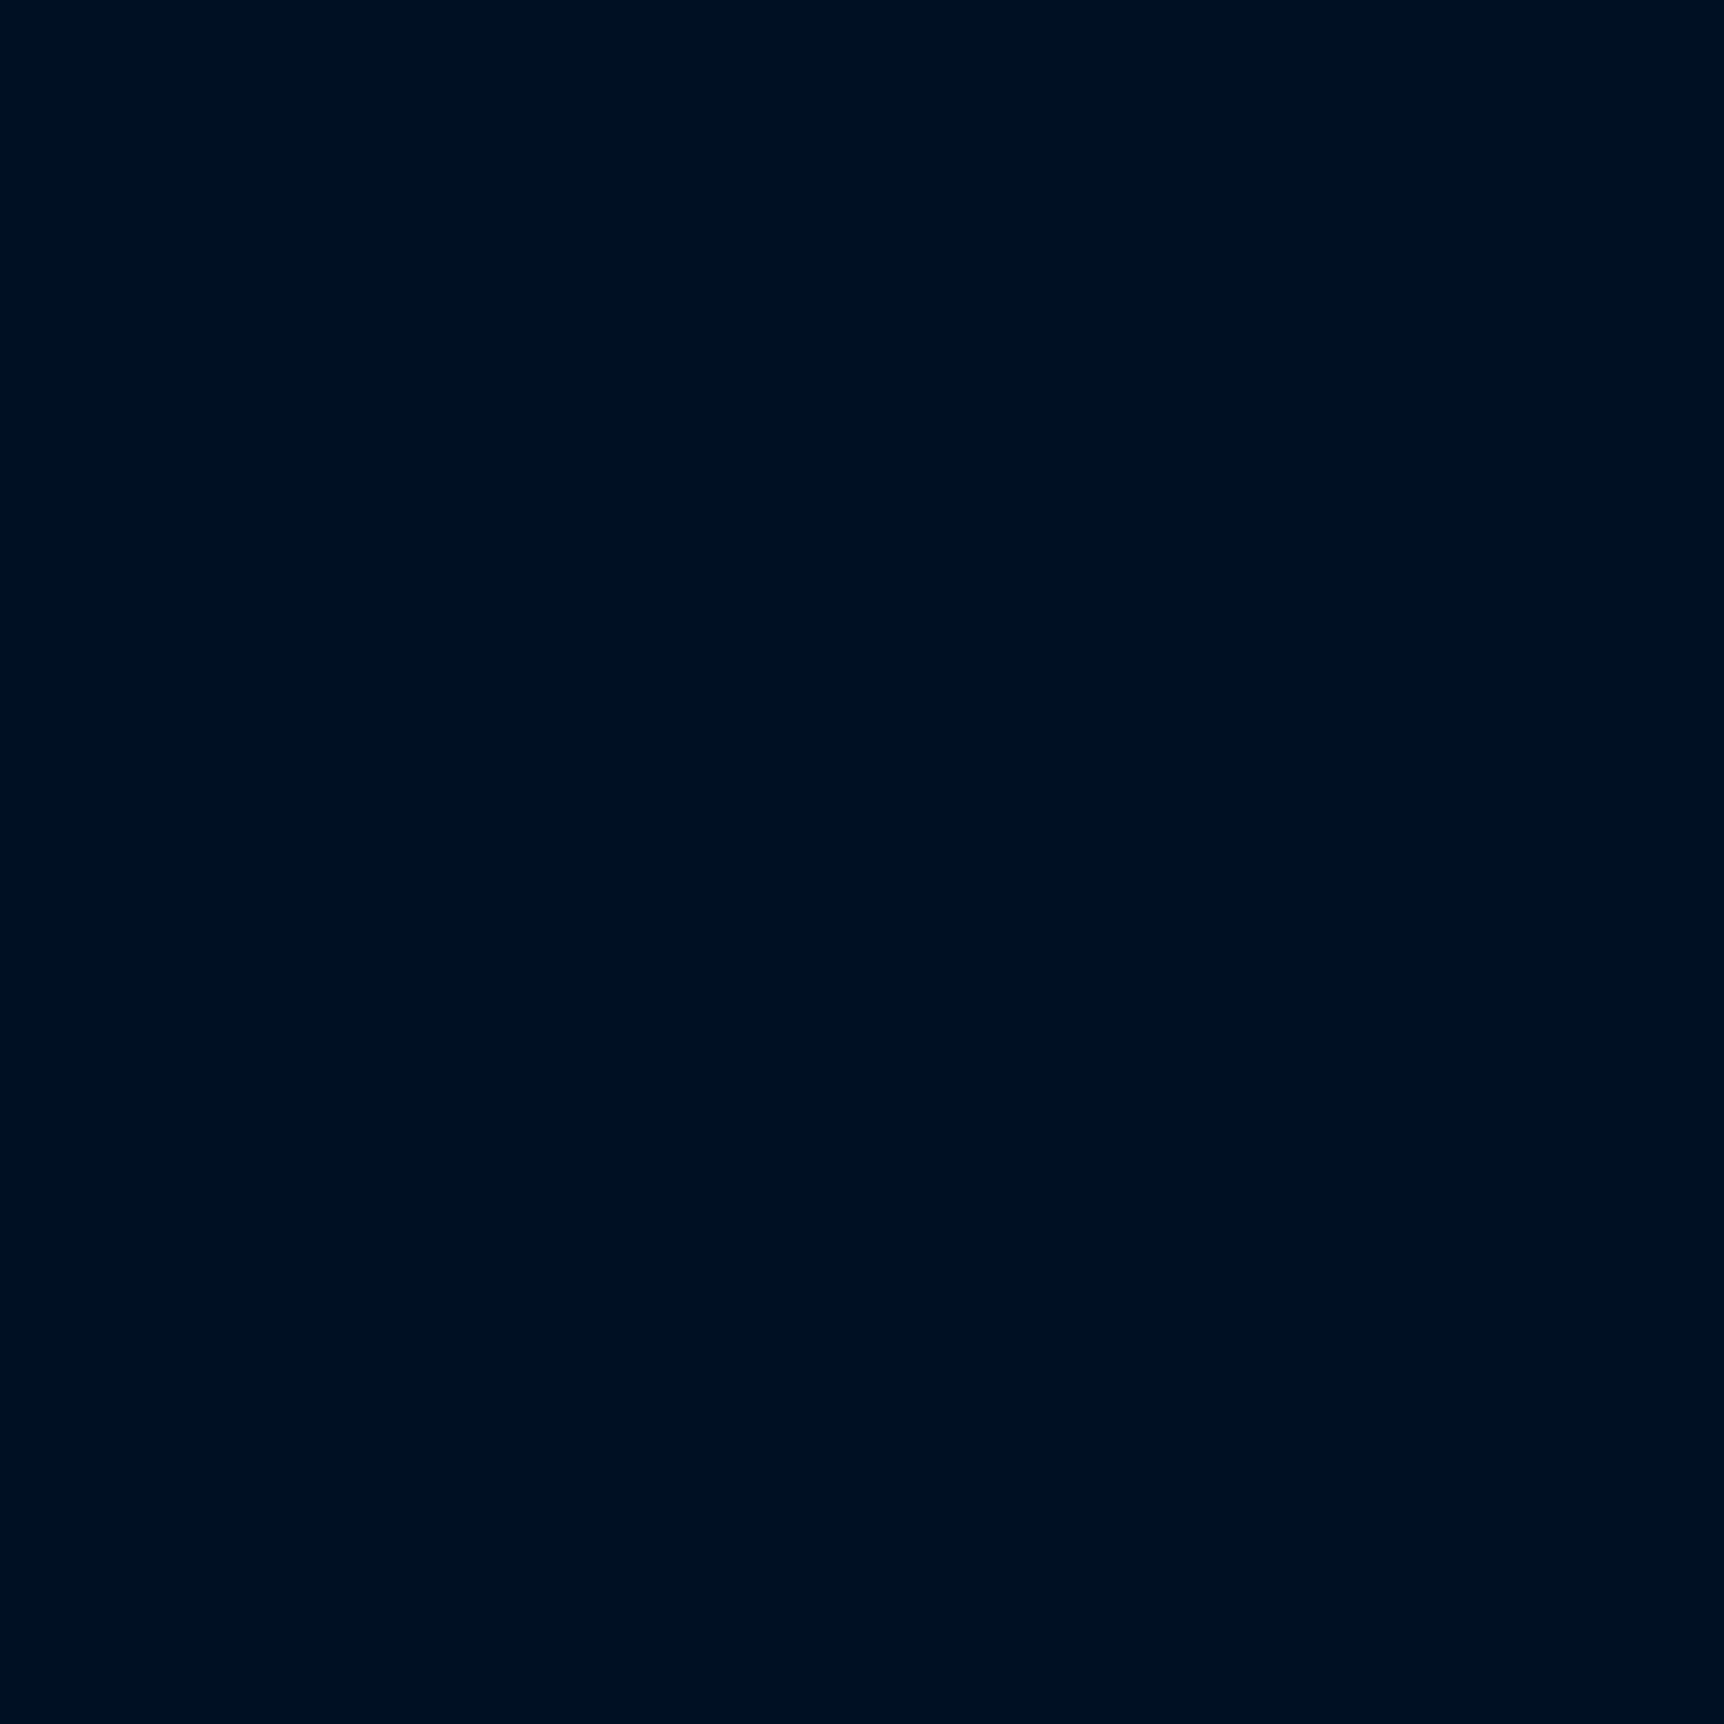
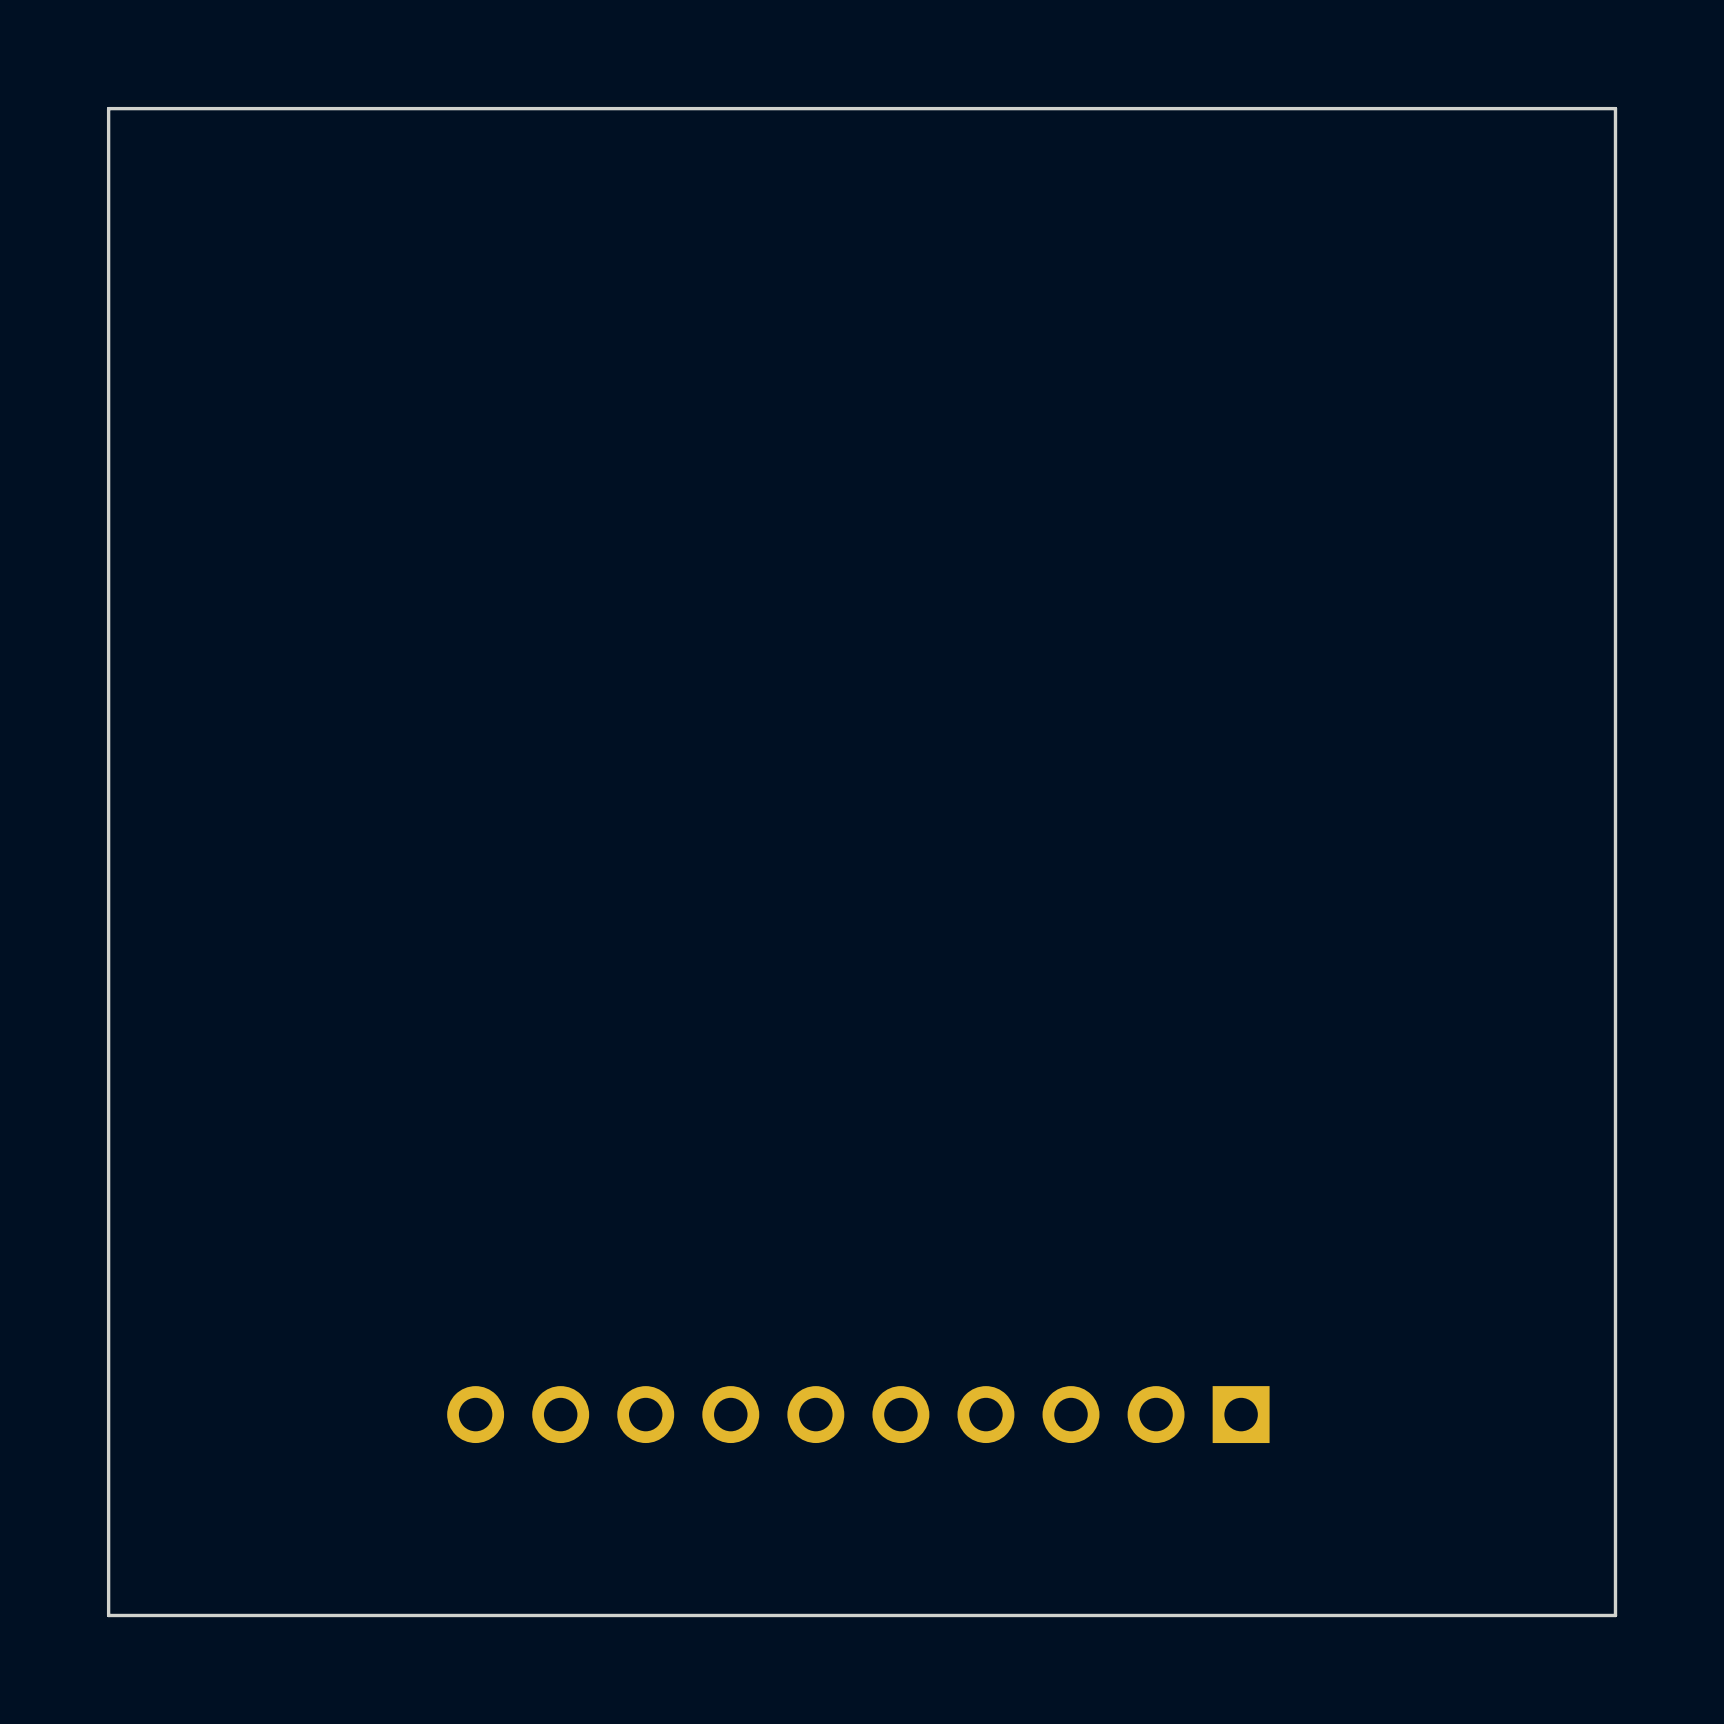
board edge: none -> (1615, 108) (108, 108) (108, 1615) (1615, 1615) (1615, 108)
part: none -> (858, 1414)

